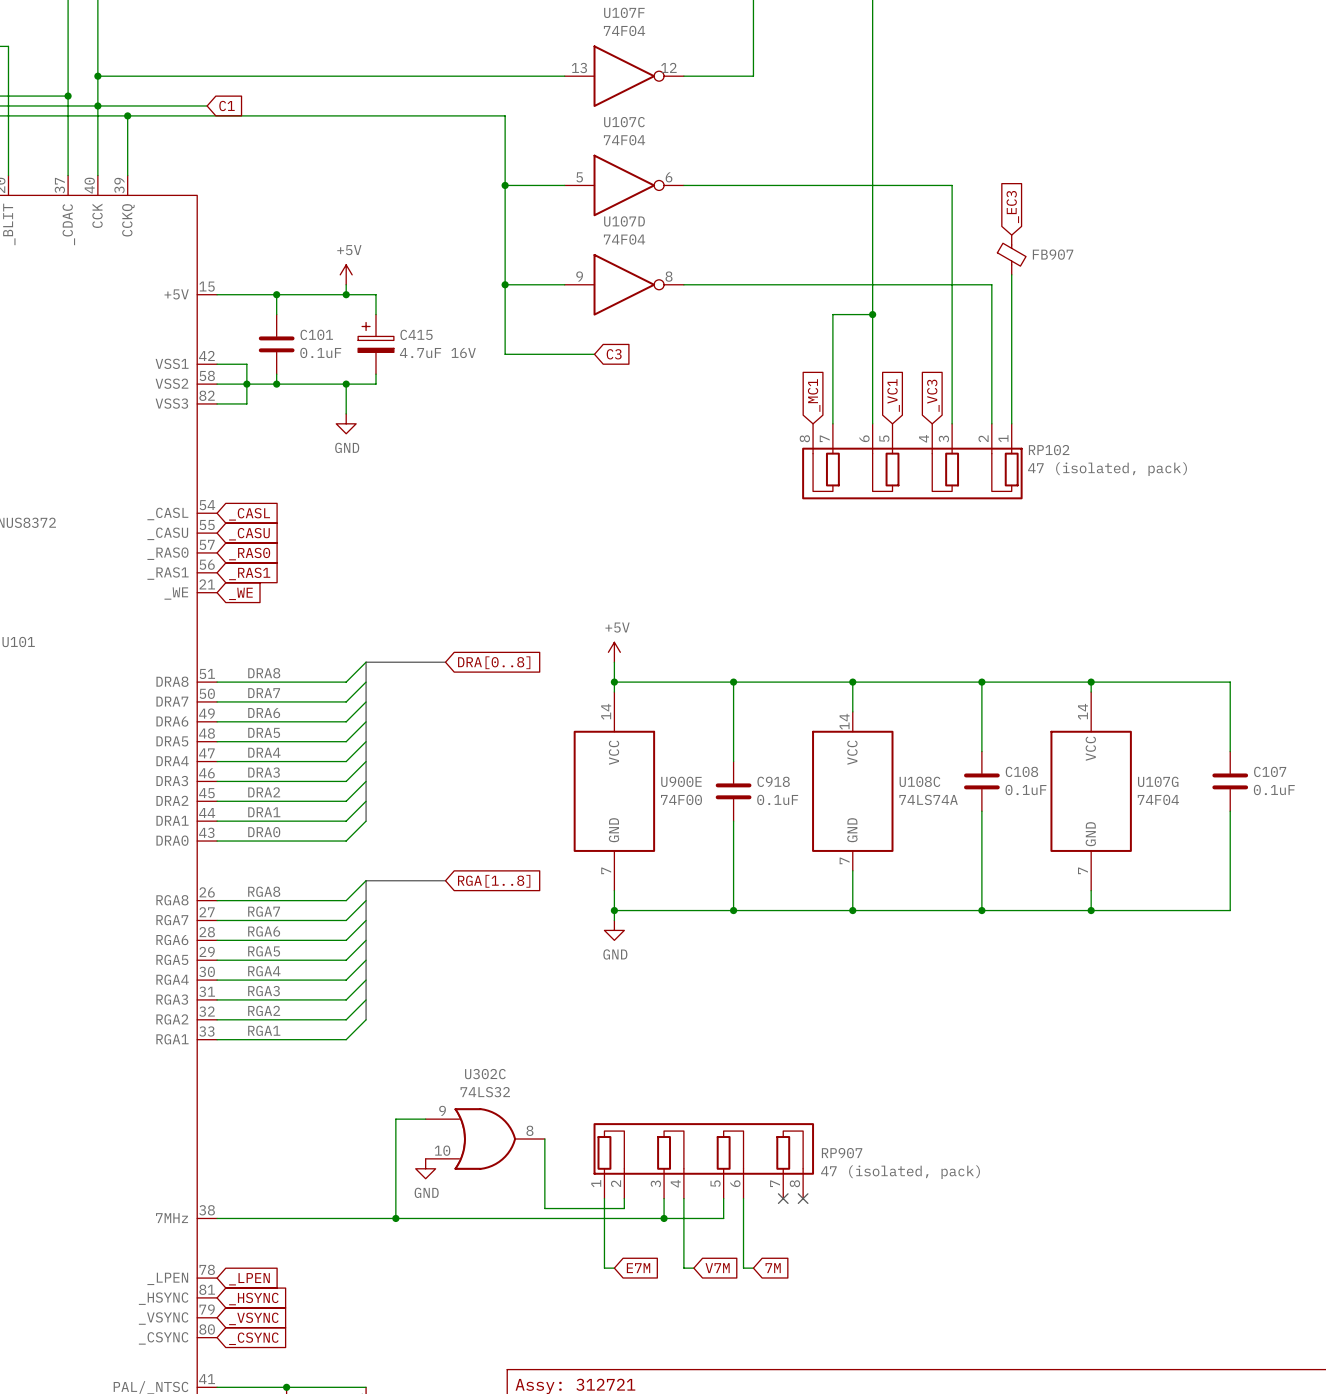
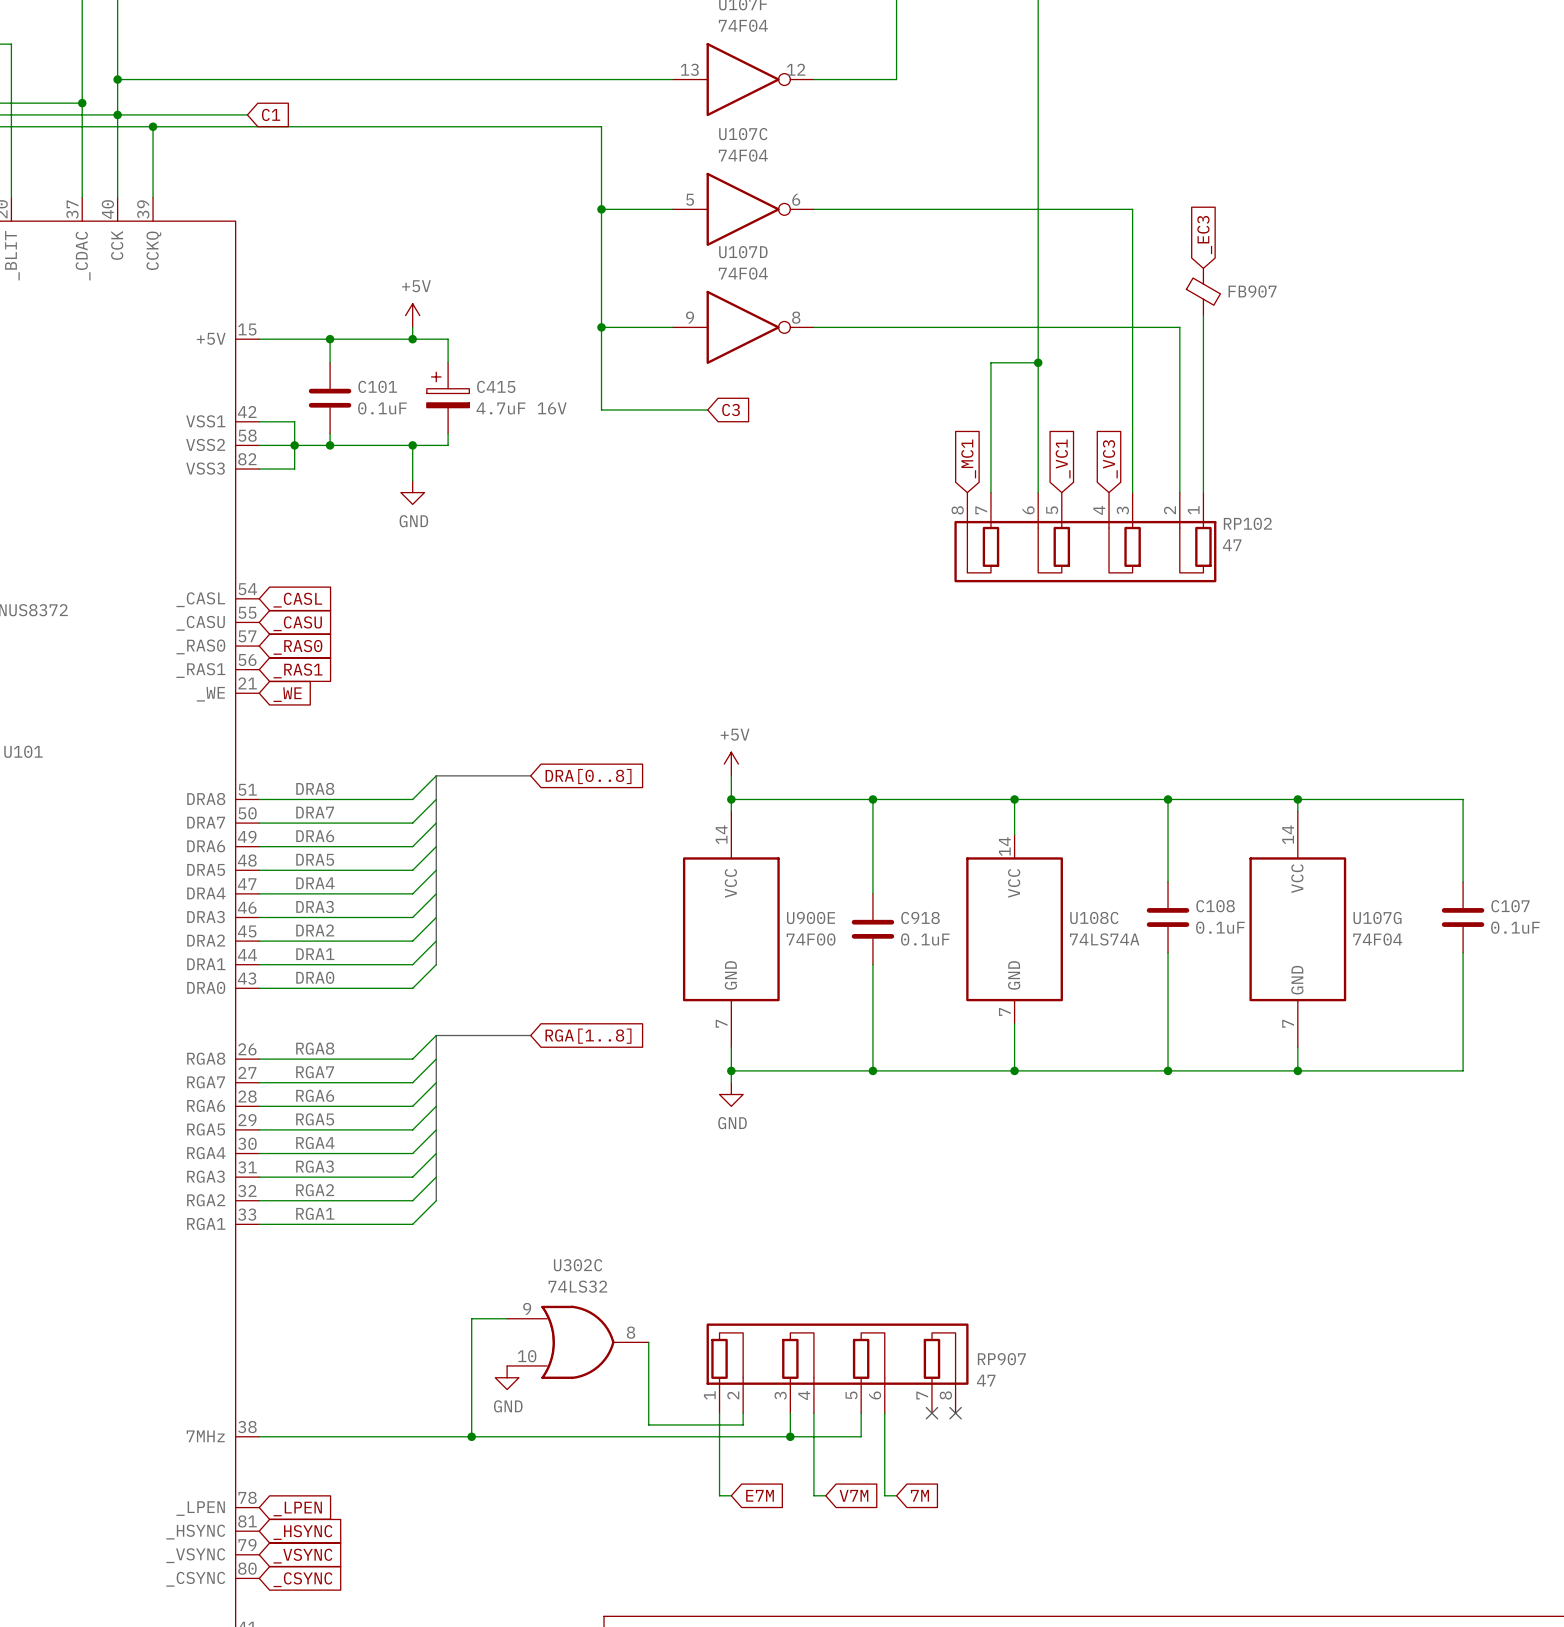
RP102 value: 47 (isolated, pack) (1107, 469) -> 47 (1232, 545)
RP907 value: 47 (isolated, pack) (900, 1172) -> 47 (986, 1380)

